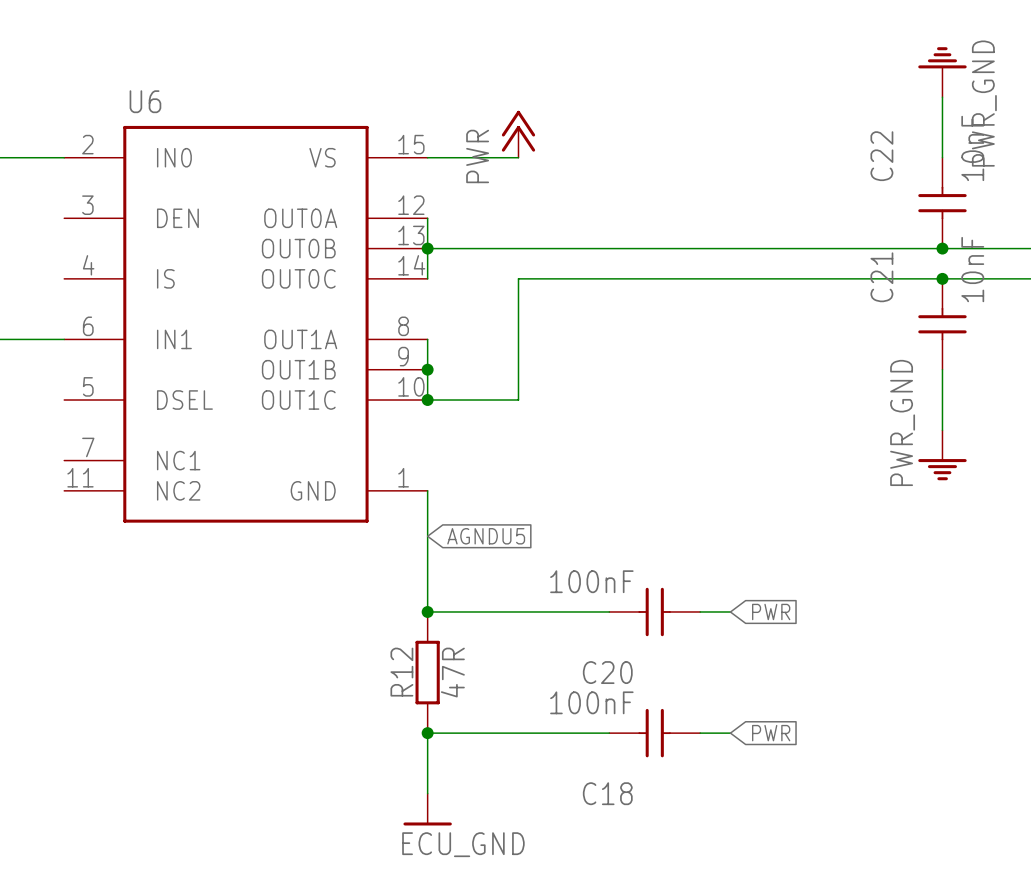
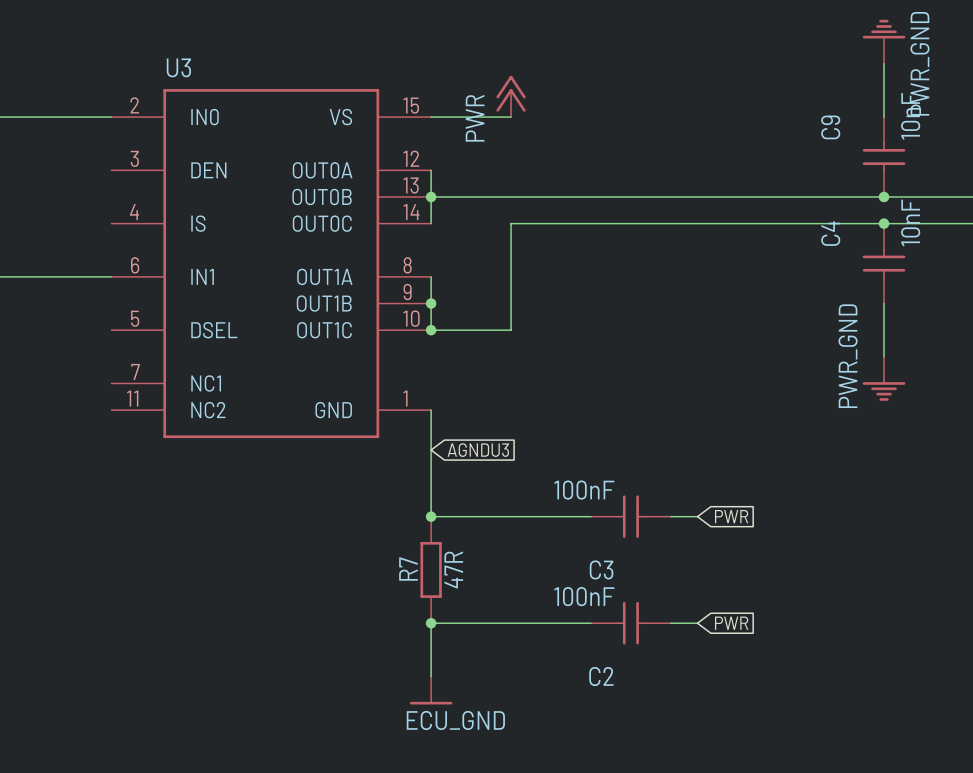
U6 name: U6 (145, 101) -> U3 (178, 67)
C22 name: C22 (881, 156) -> C9 (830, 127)
C21 name: C21 (881, 277) -> C4 (830, 233)
global label: AGNDU5 (486, 536) -> AGNDU3 (478, 450)
R12 name: R12 (401, 672) -> R7 (408, 569)
C20 name: C20 (607, 672) -> C3 (601, 569)
C18 name: C18 (607, 793) -> C2 (601, 676)

